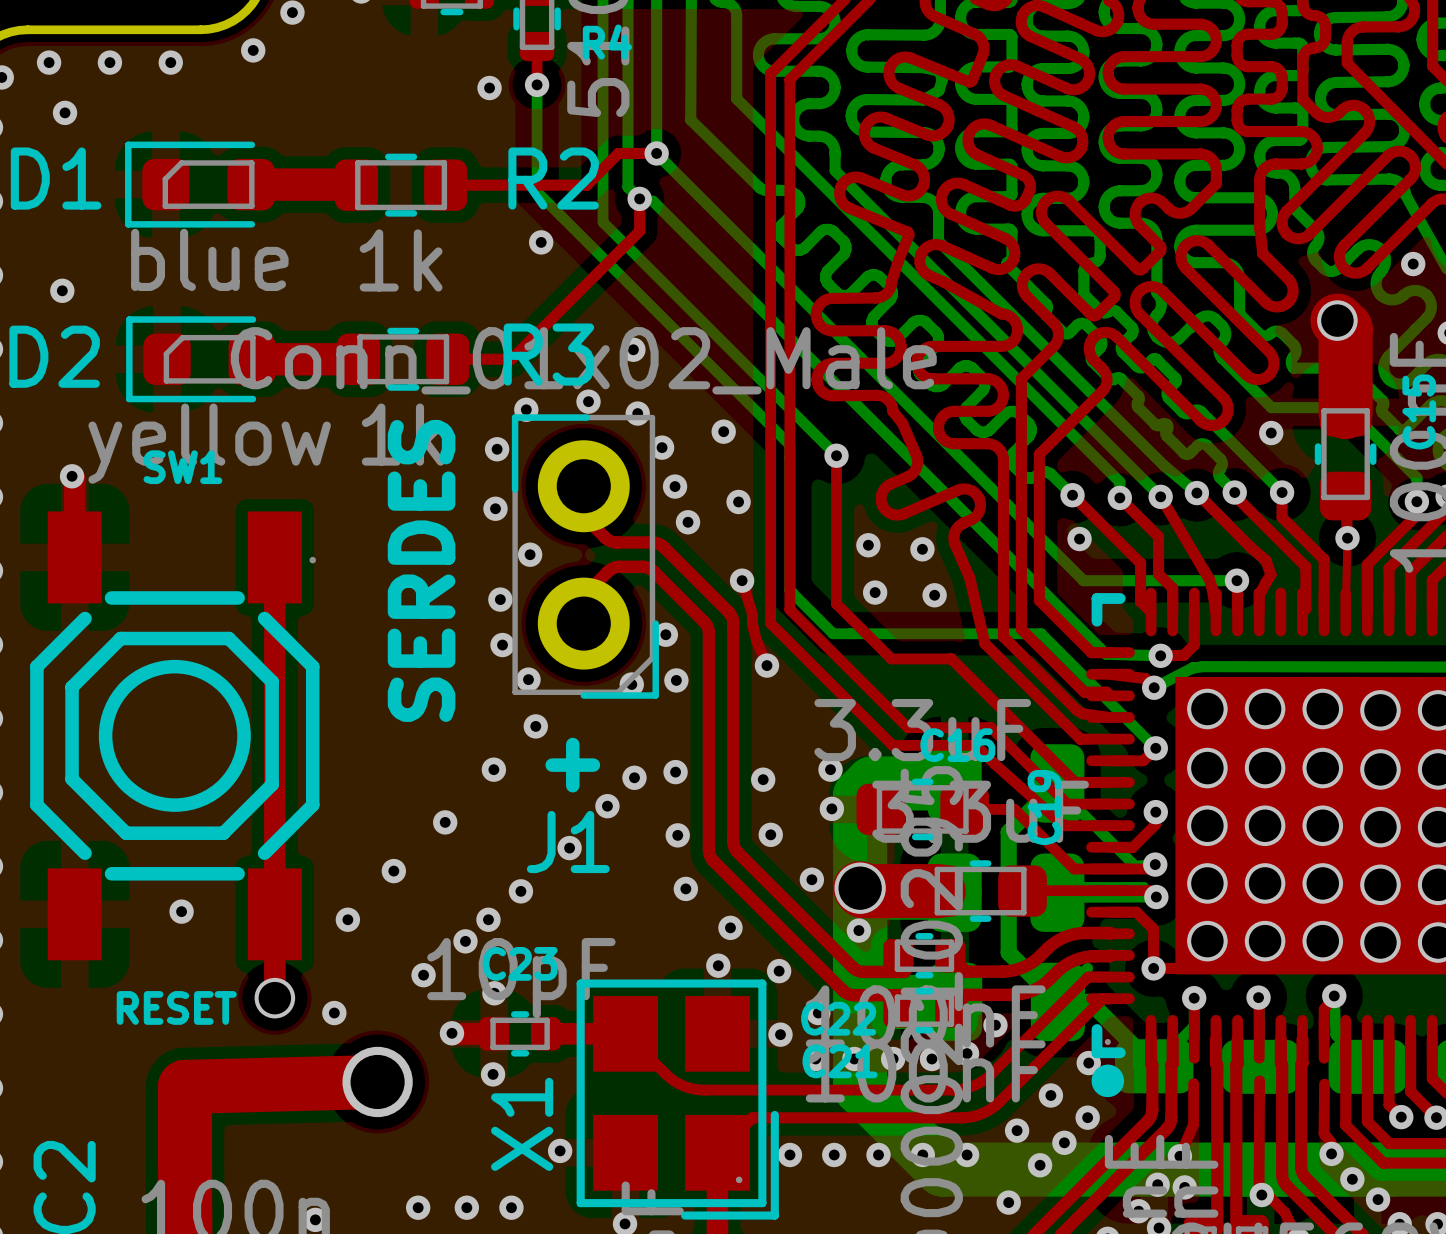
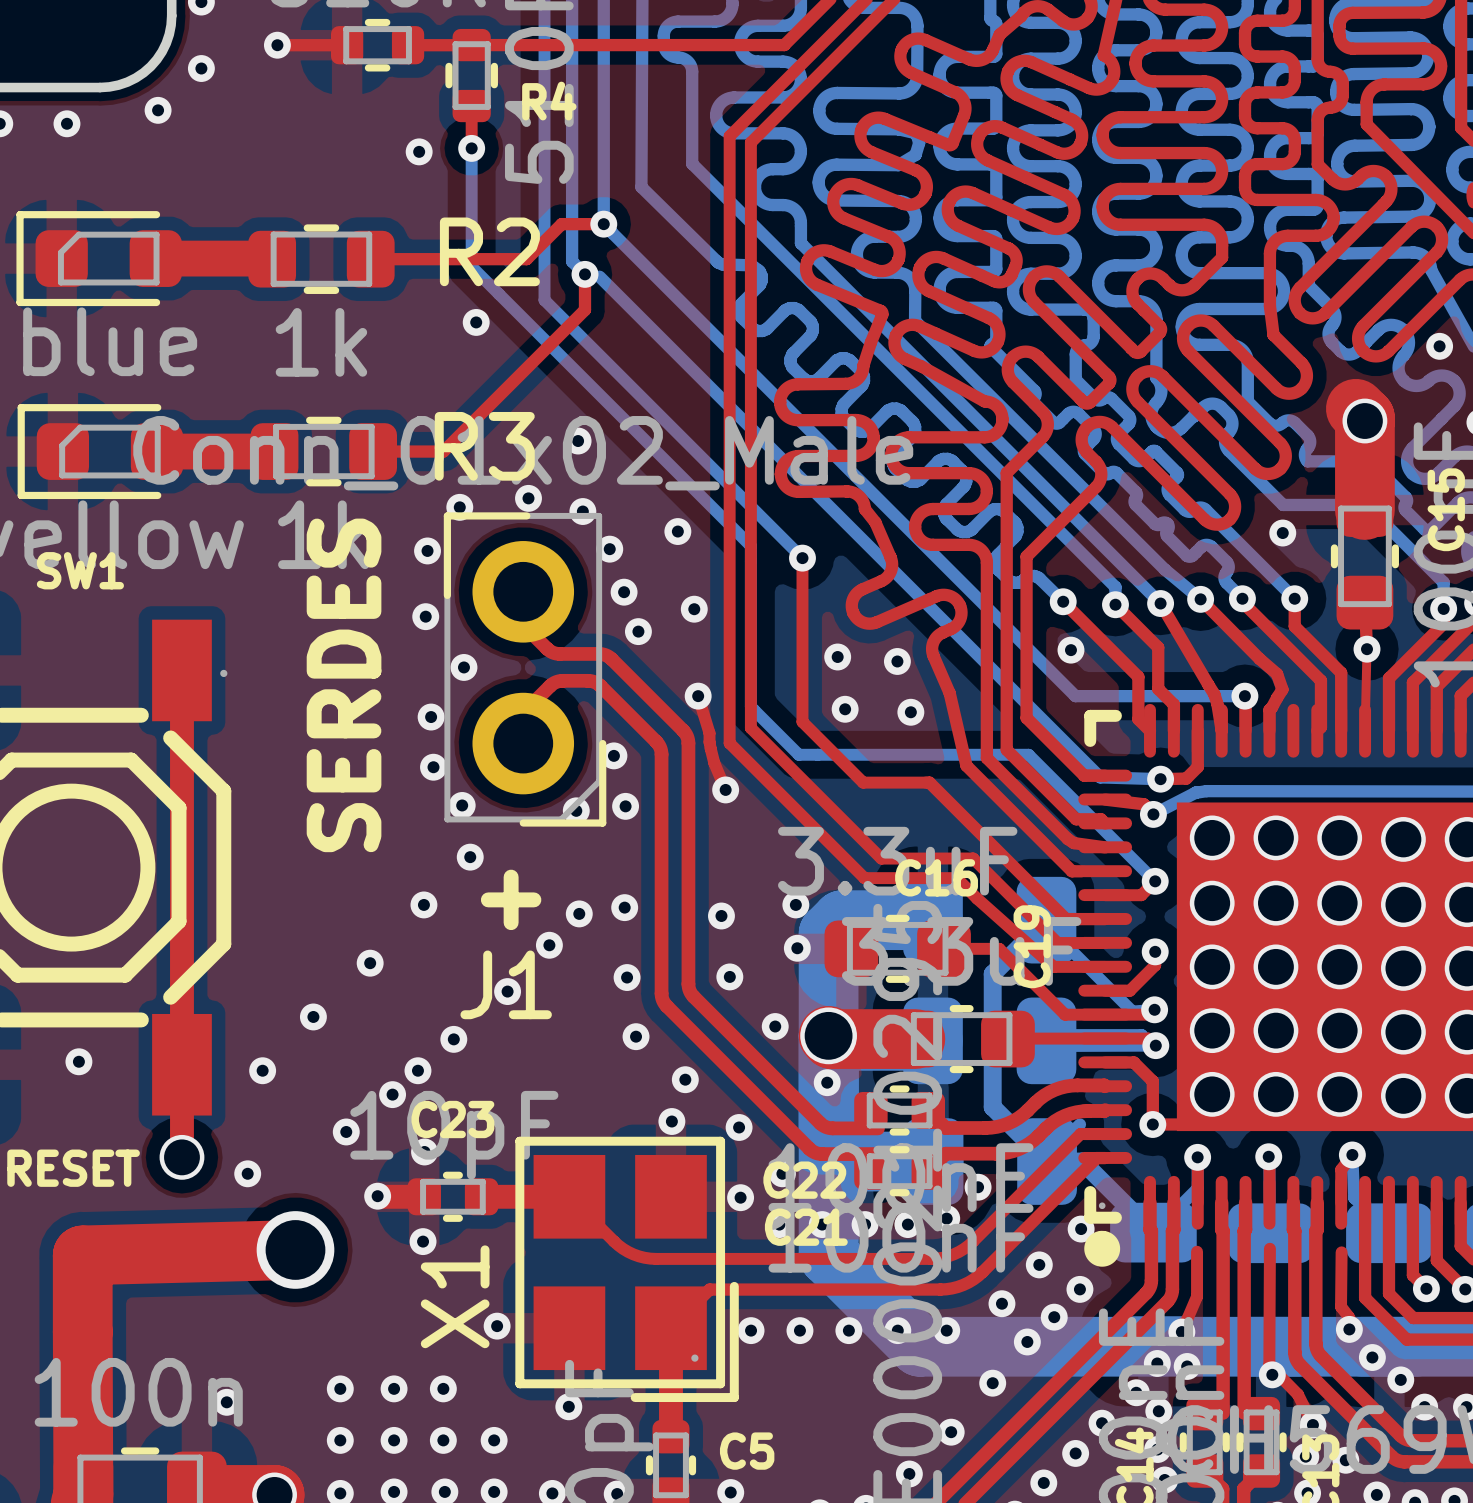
via position: (1337, 320) -> (1364, 421)

